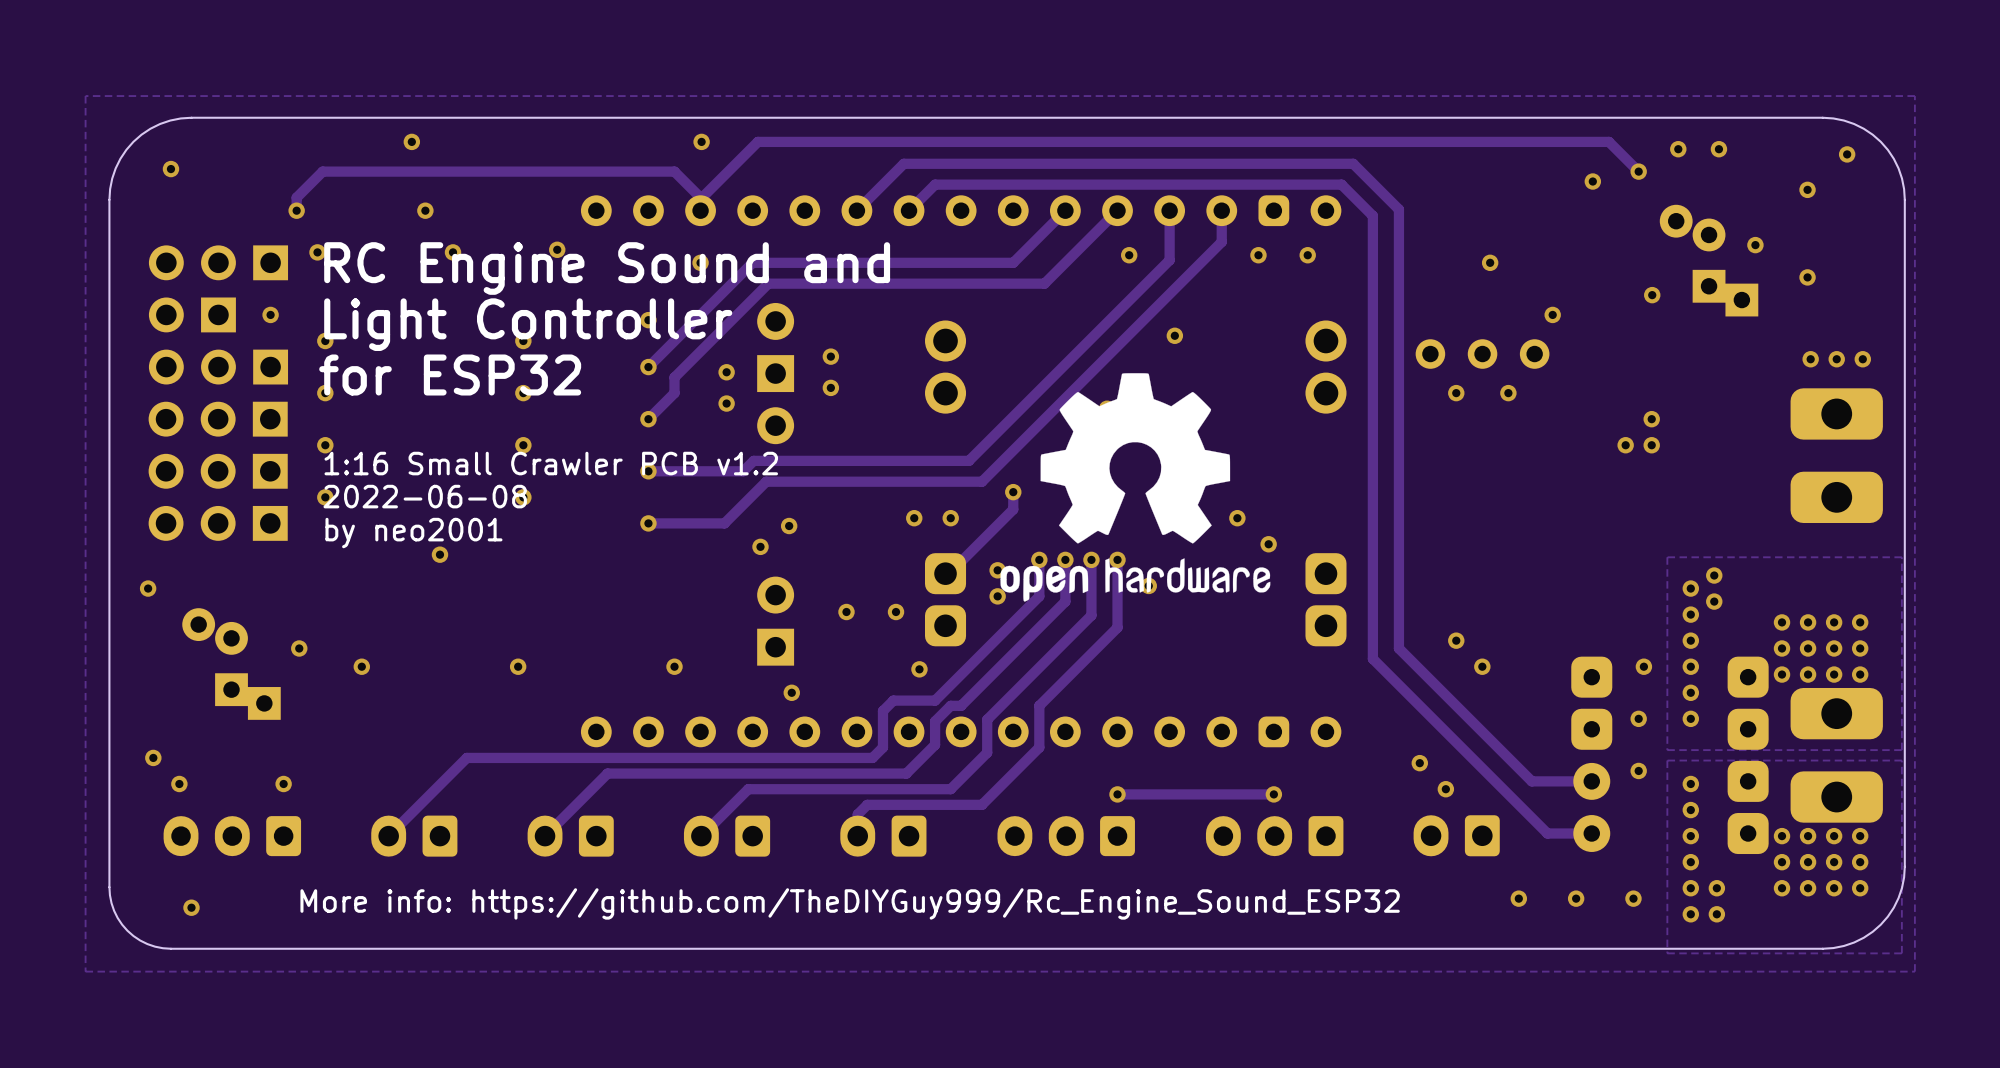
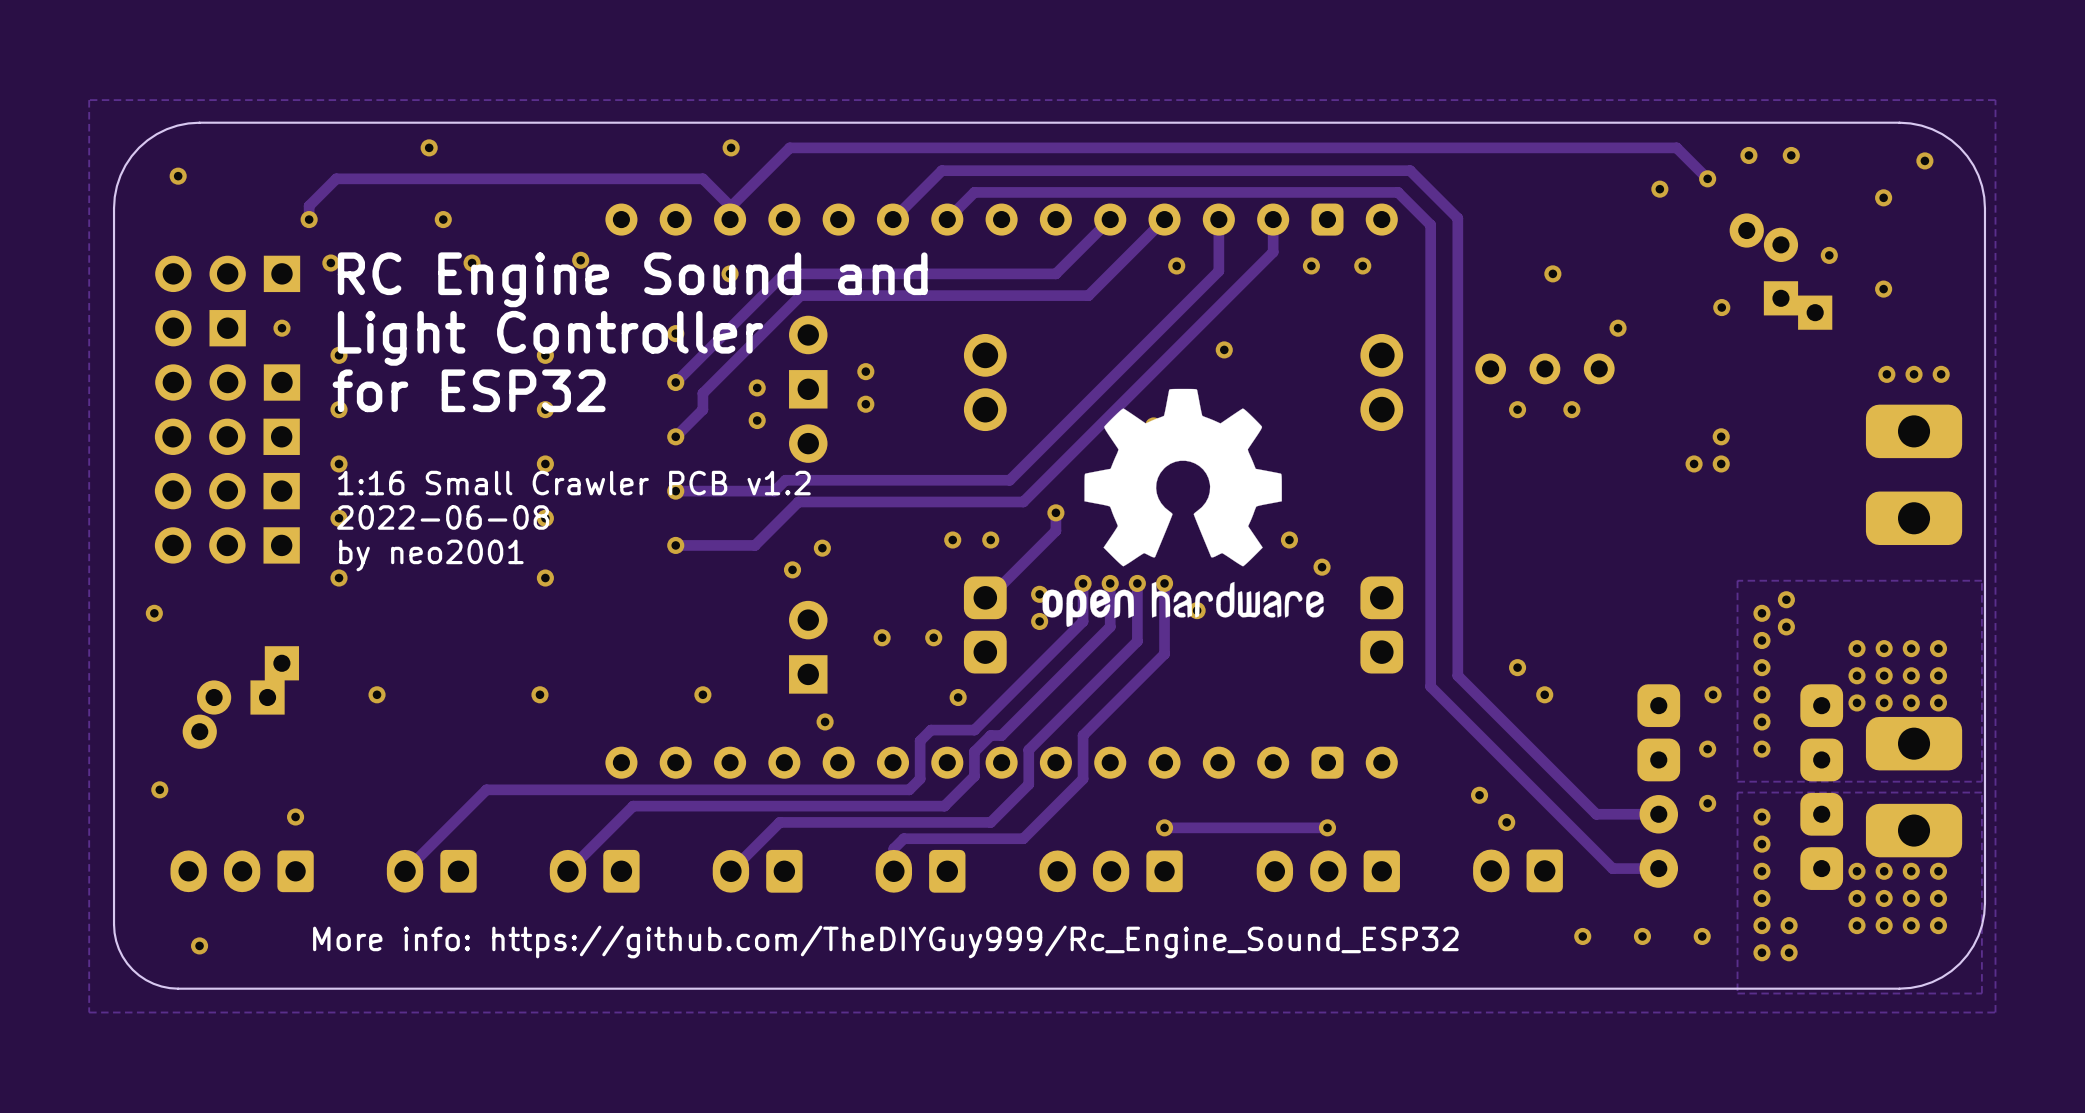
via: none -> (339, 578)
via: (439, 554) -> none
via: none -> (545, 578)
via: (299, 648) -> none
part rotation: 0° (231, 664) -> 90° counterclockwise (240, 697)
via: (179, 783) -> none

